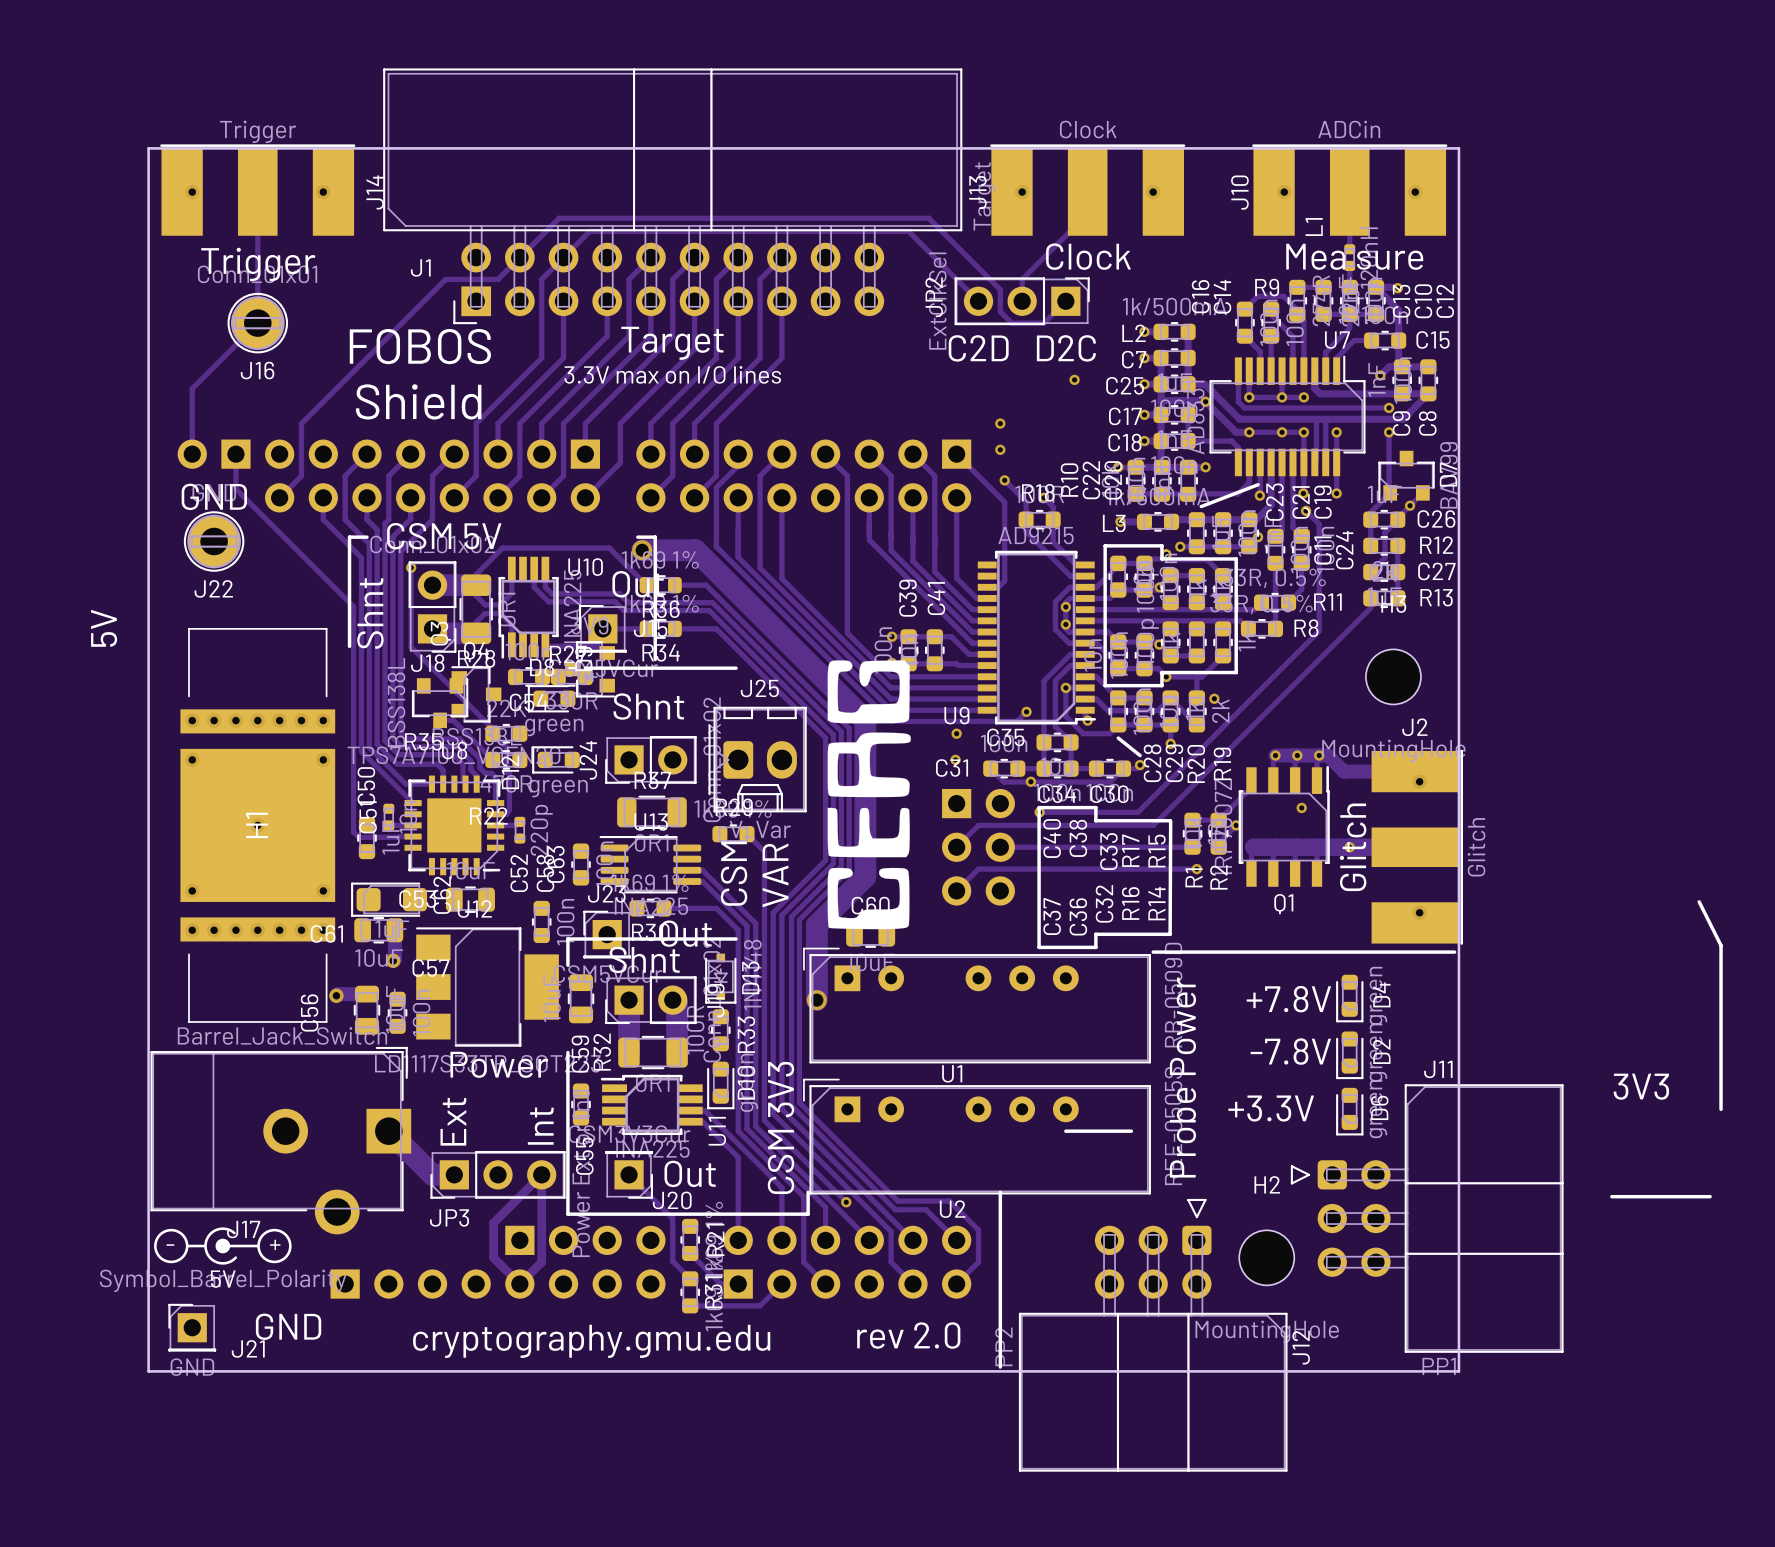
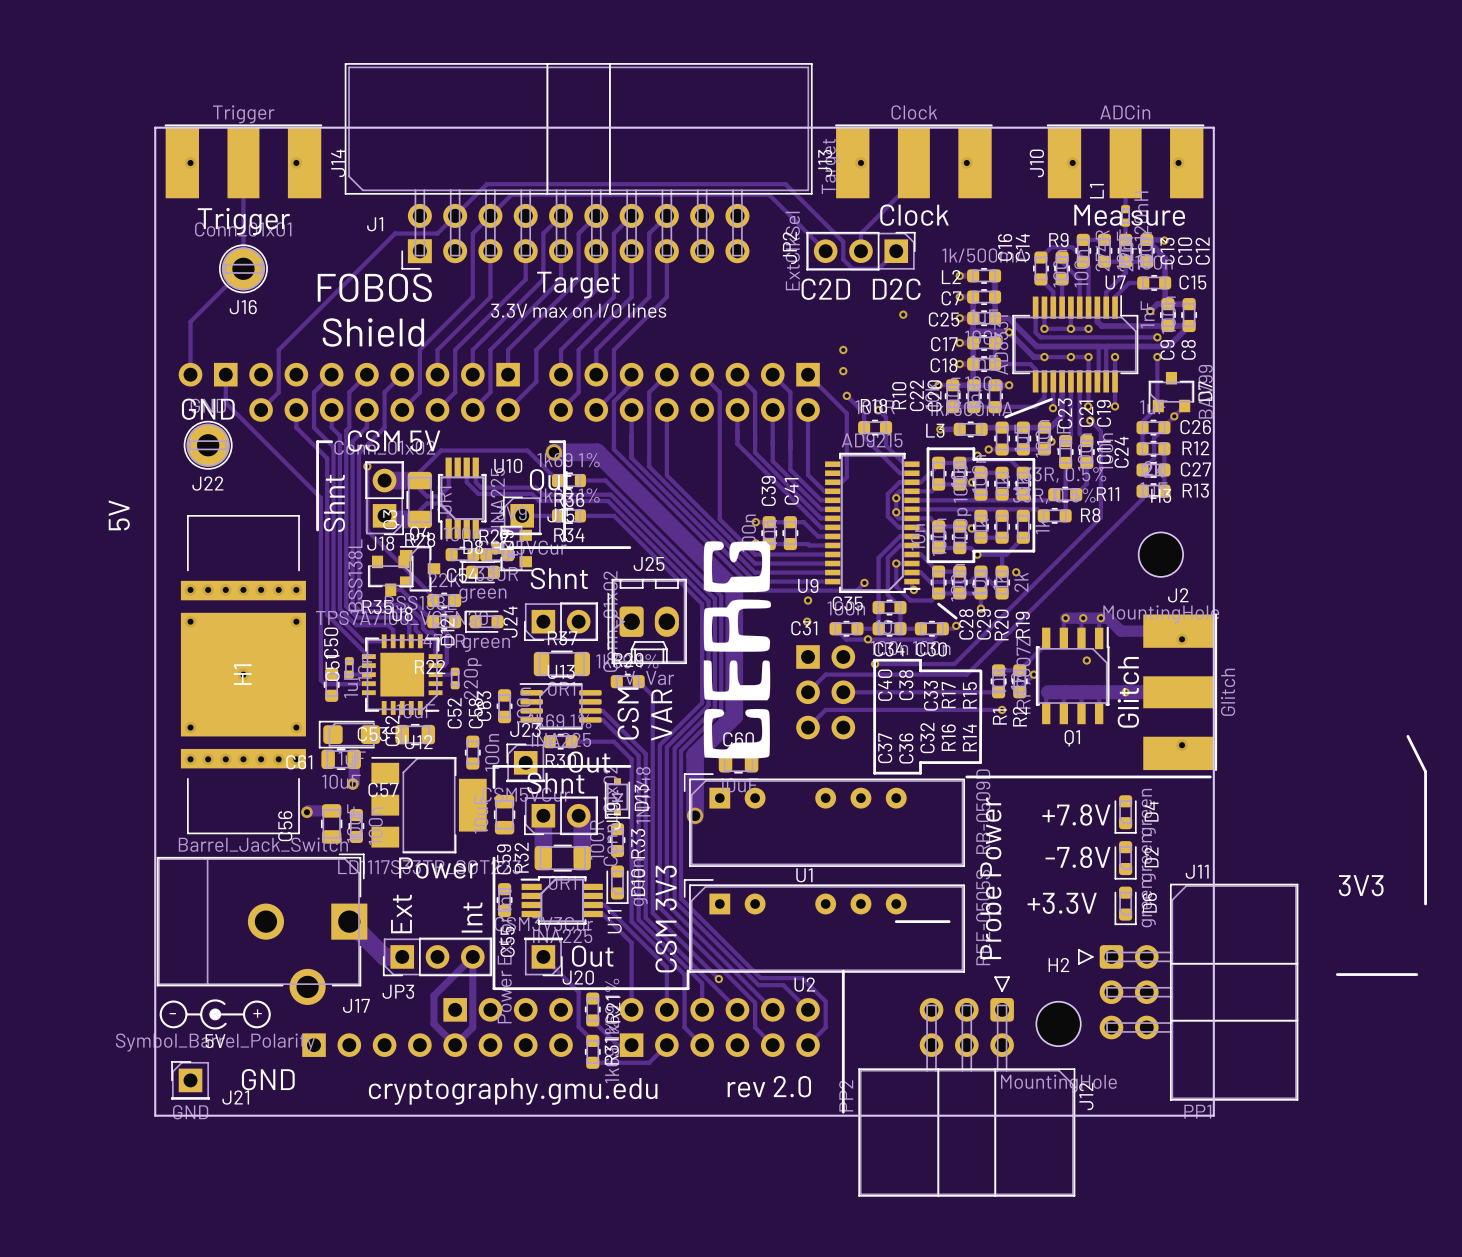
J17 name position: J17 (243, 1229) -> J17 (356, 1005)

